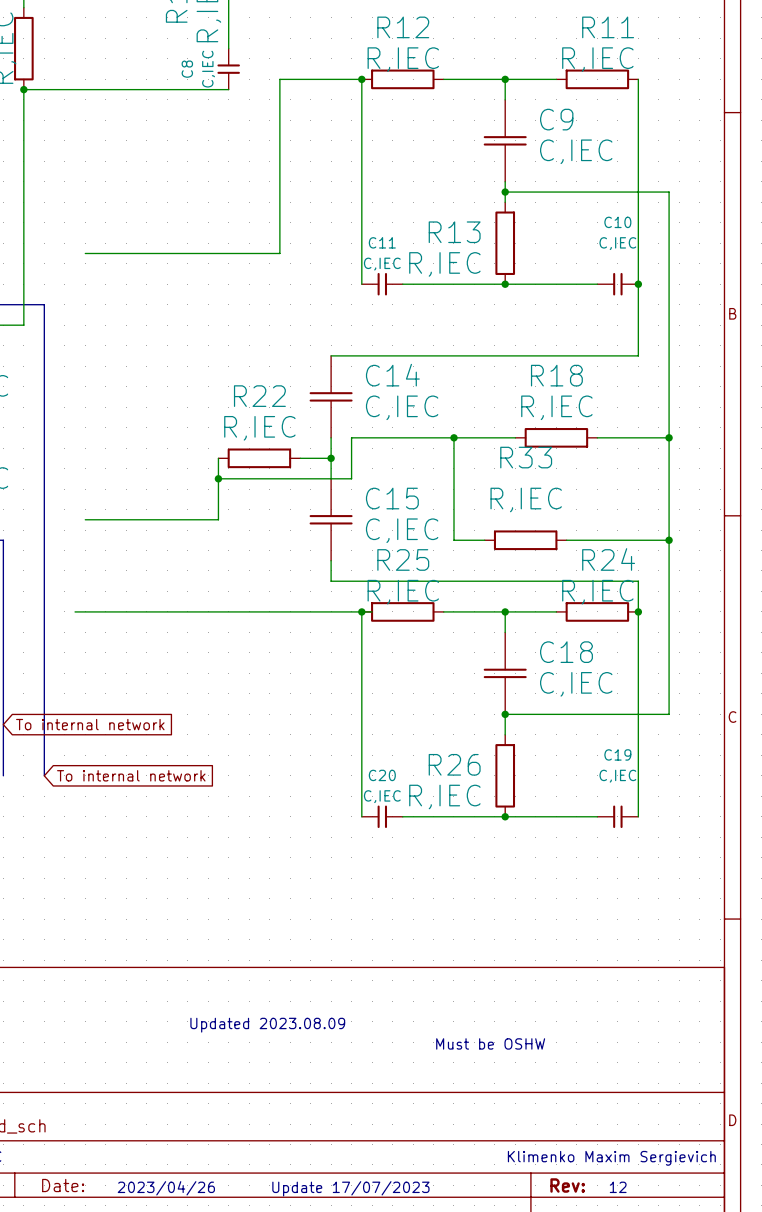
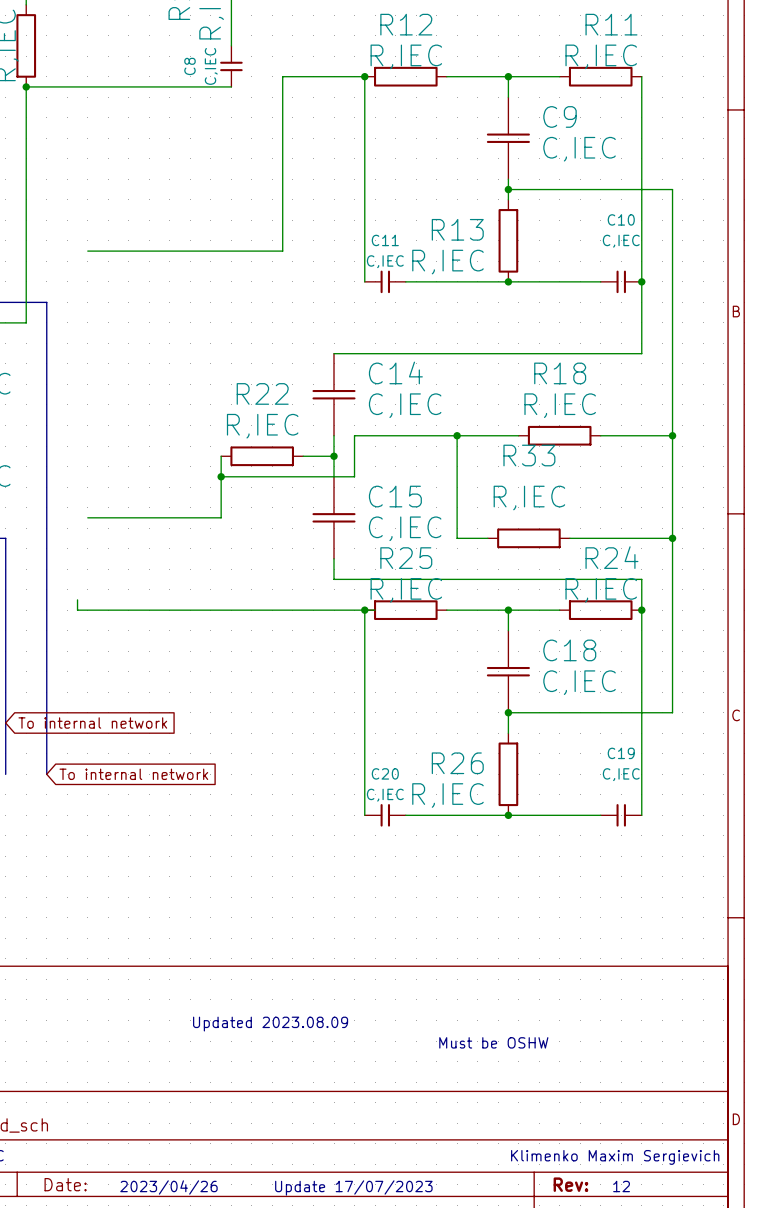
wire: none -> (77, 599) (77, 610)

